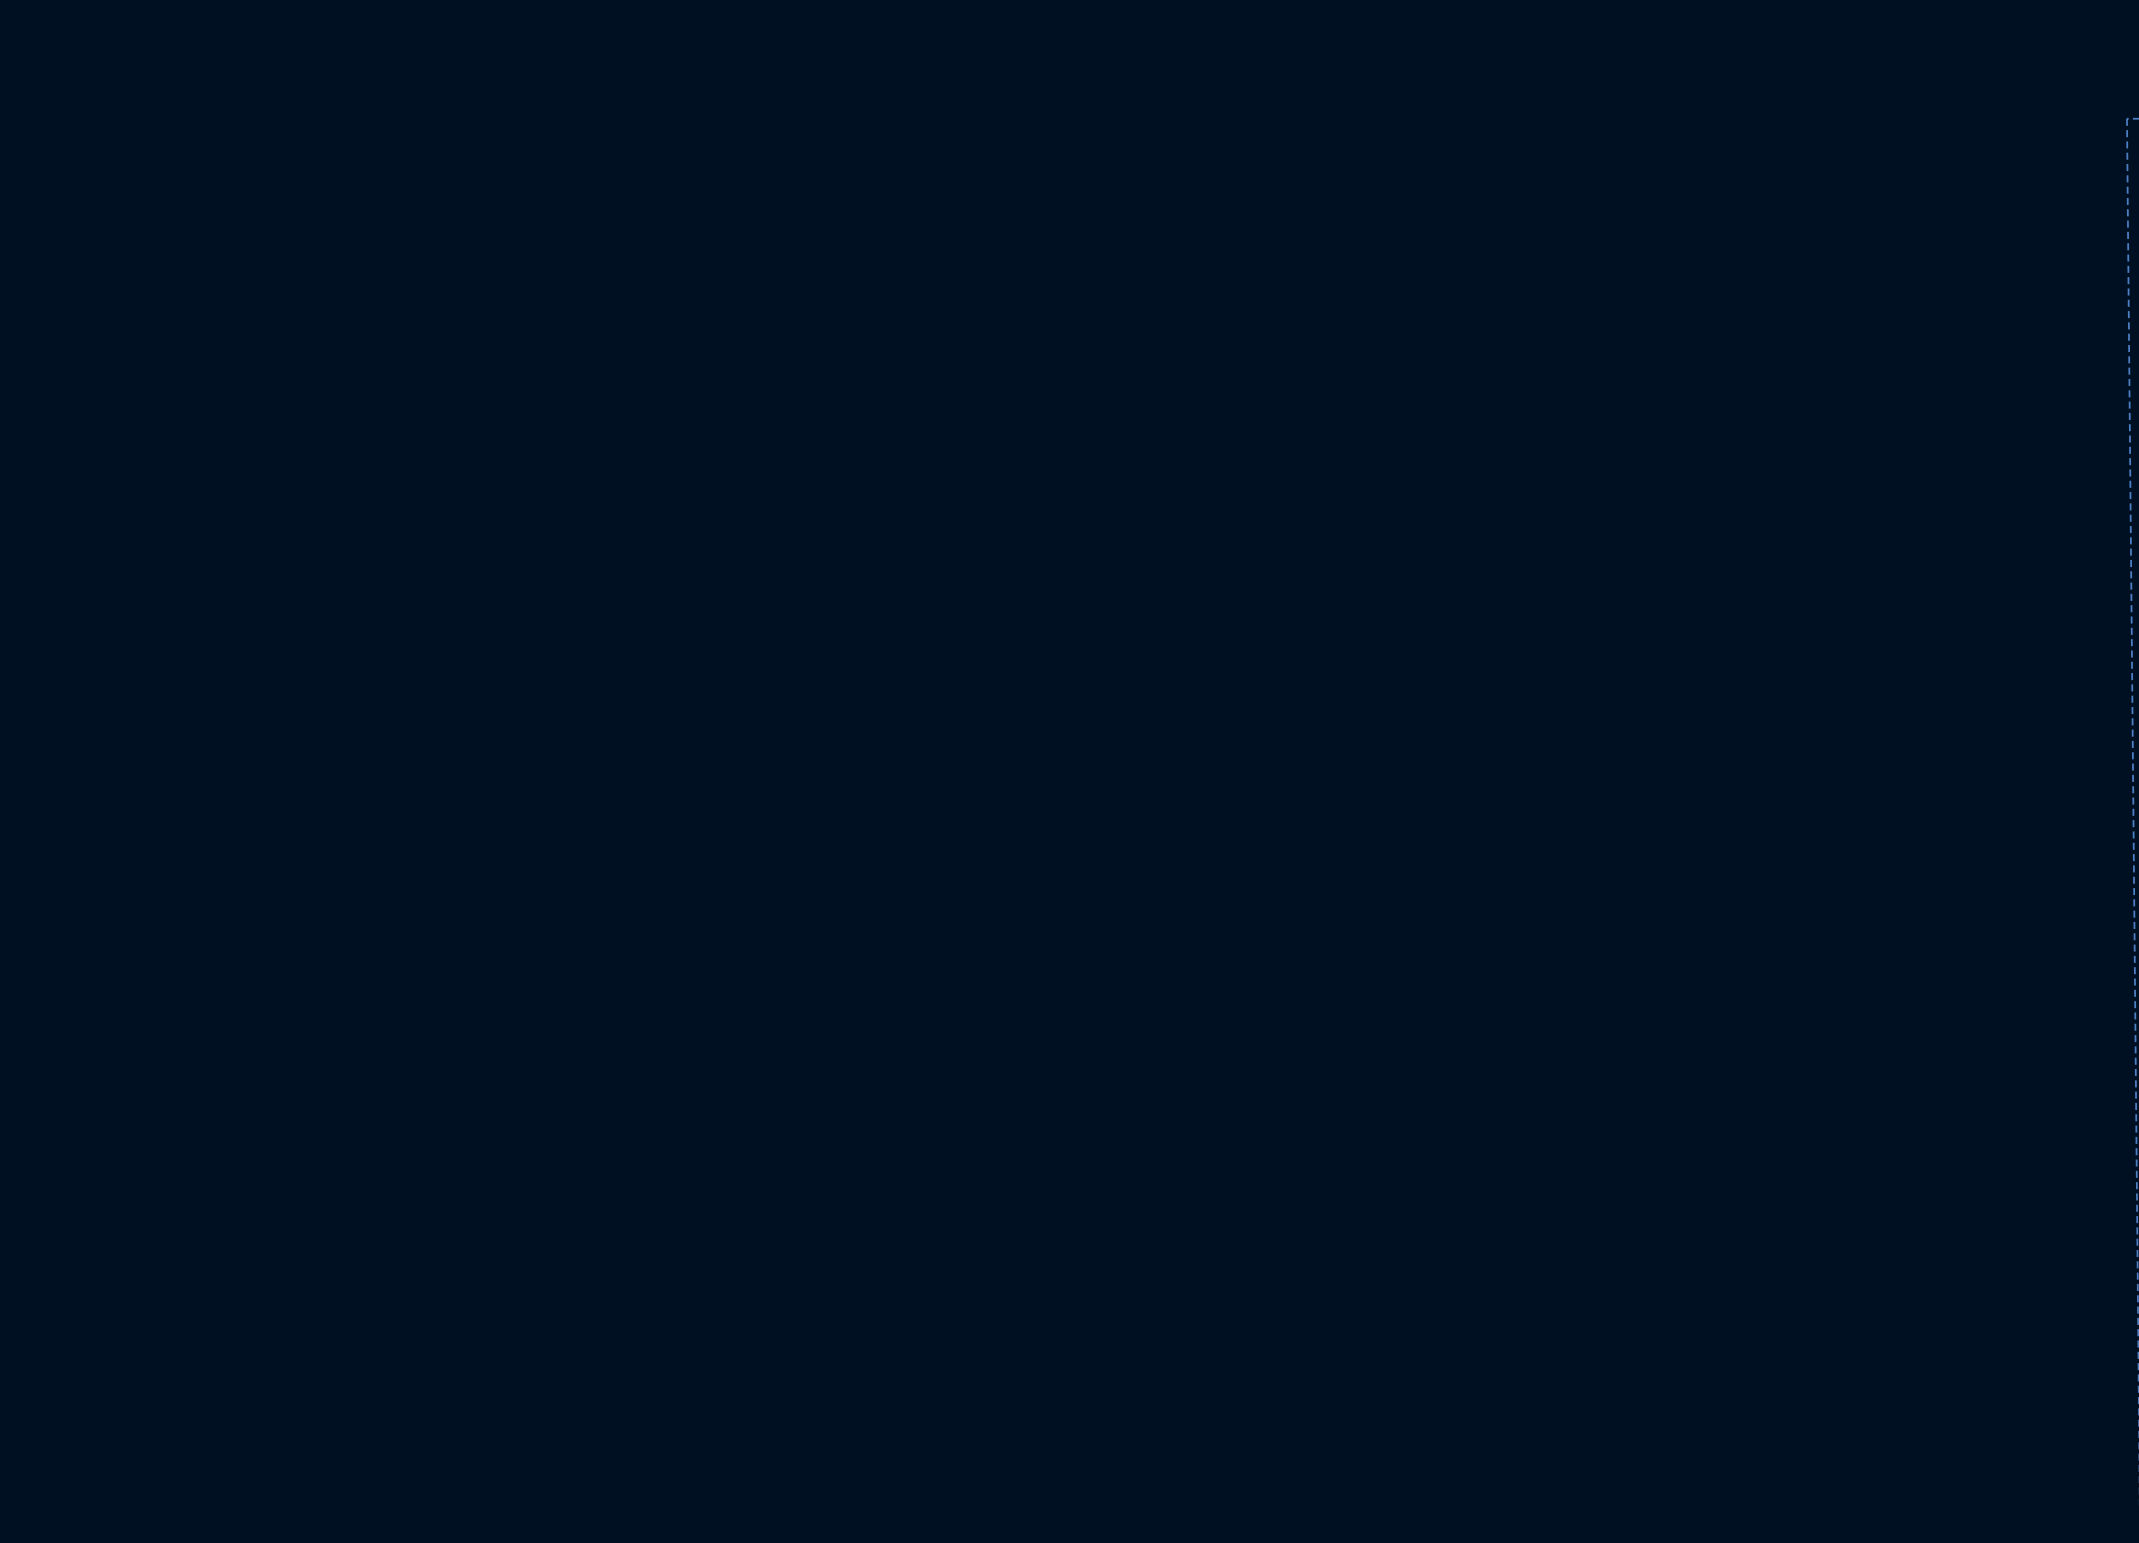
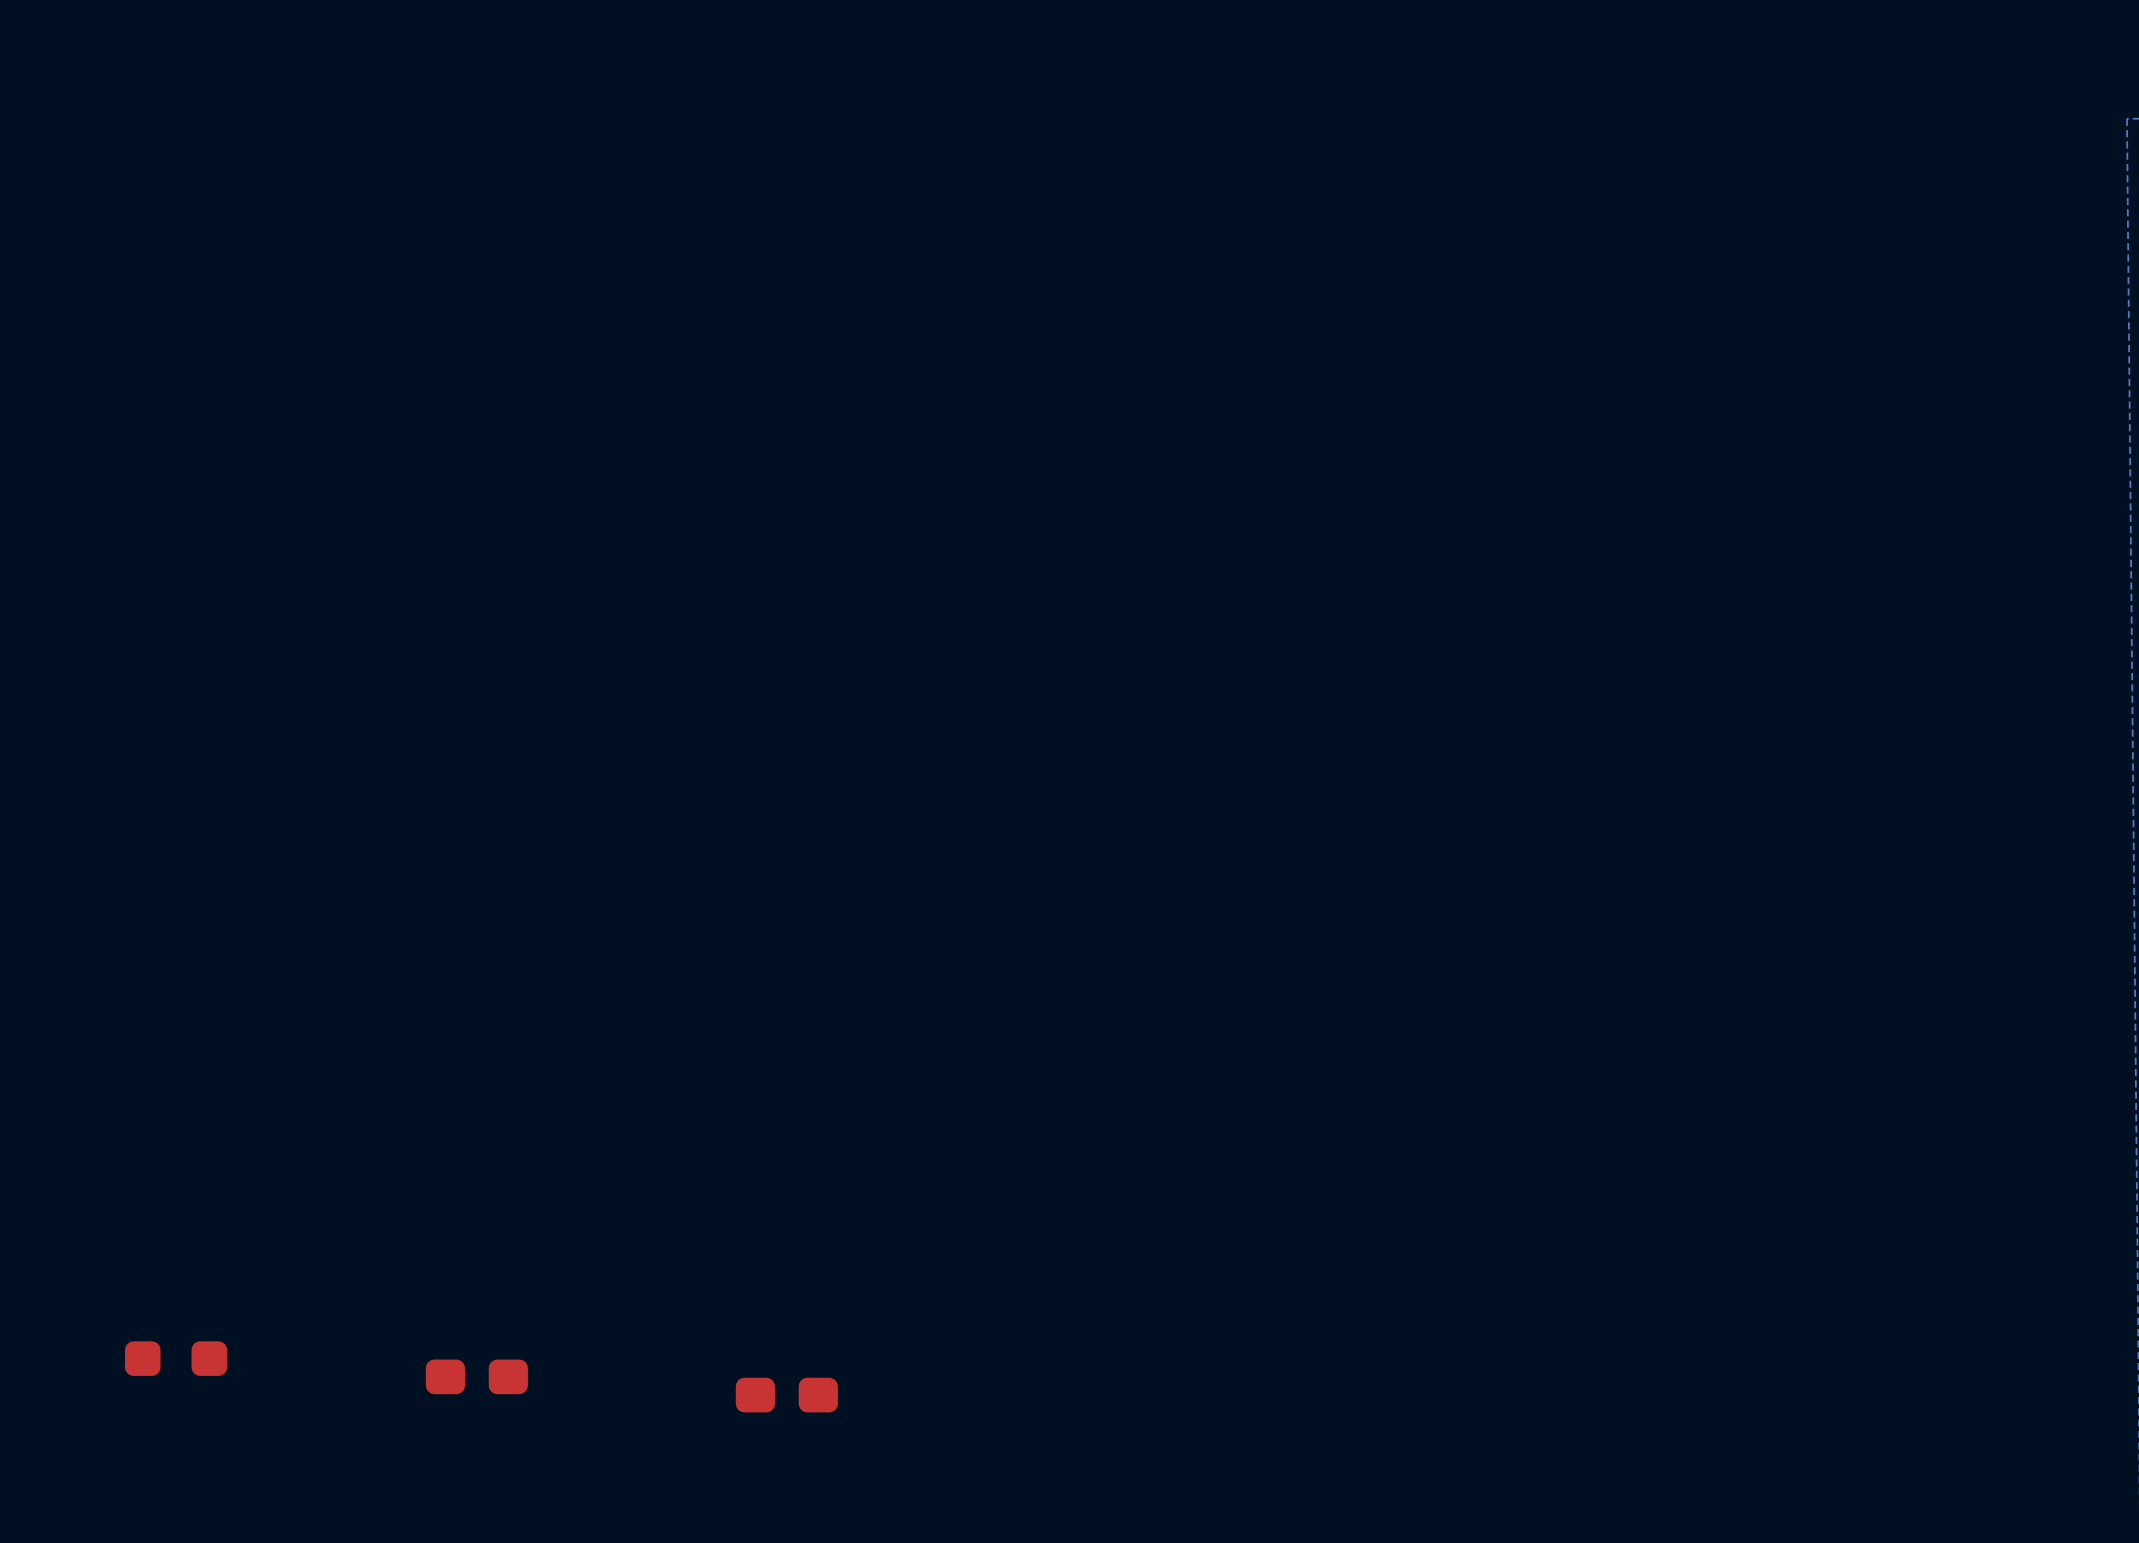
part: none -> (176, 1358)
part: none -> (476, 1376)
part: none -> (786, 1395)

